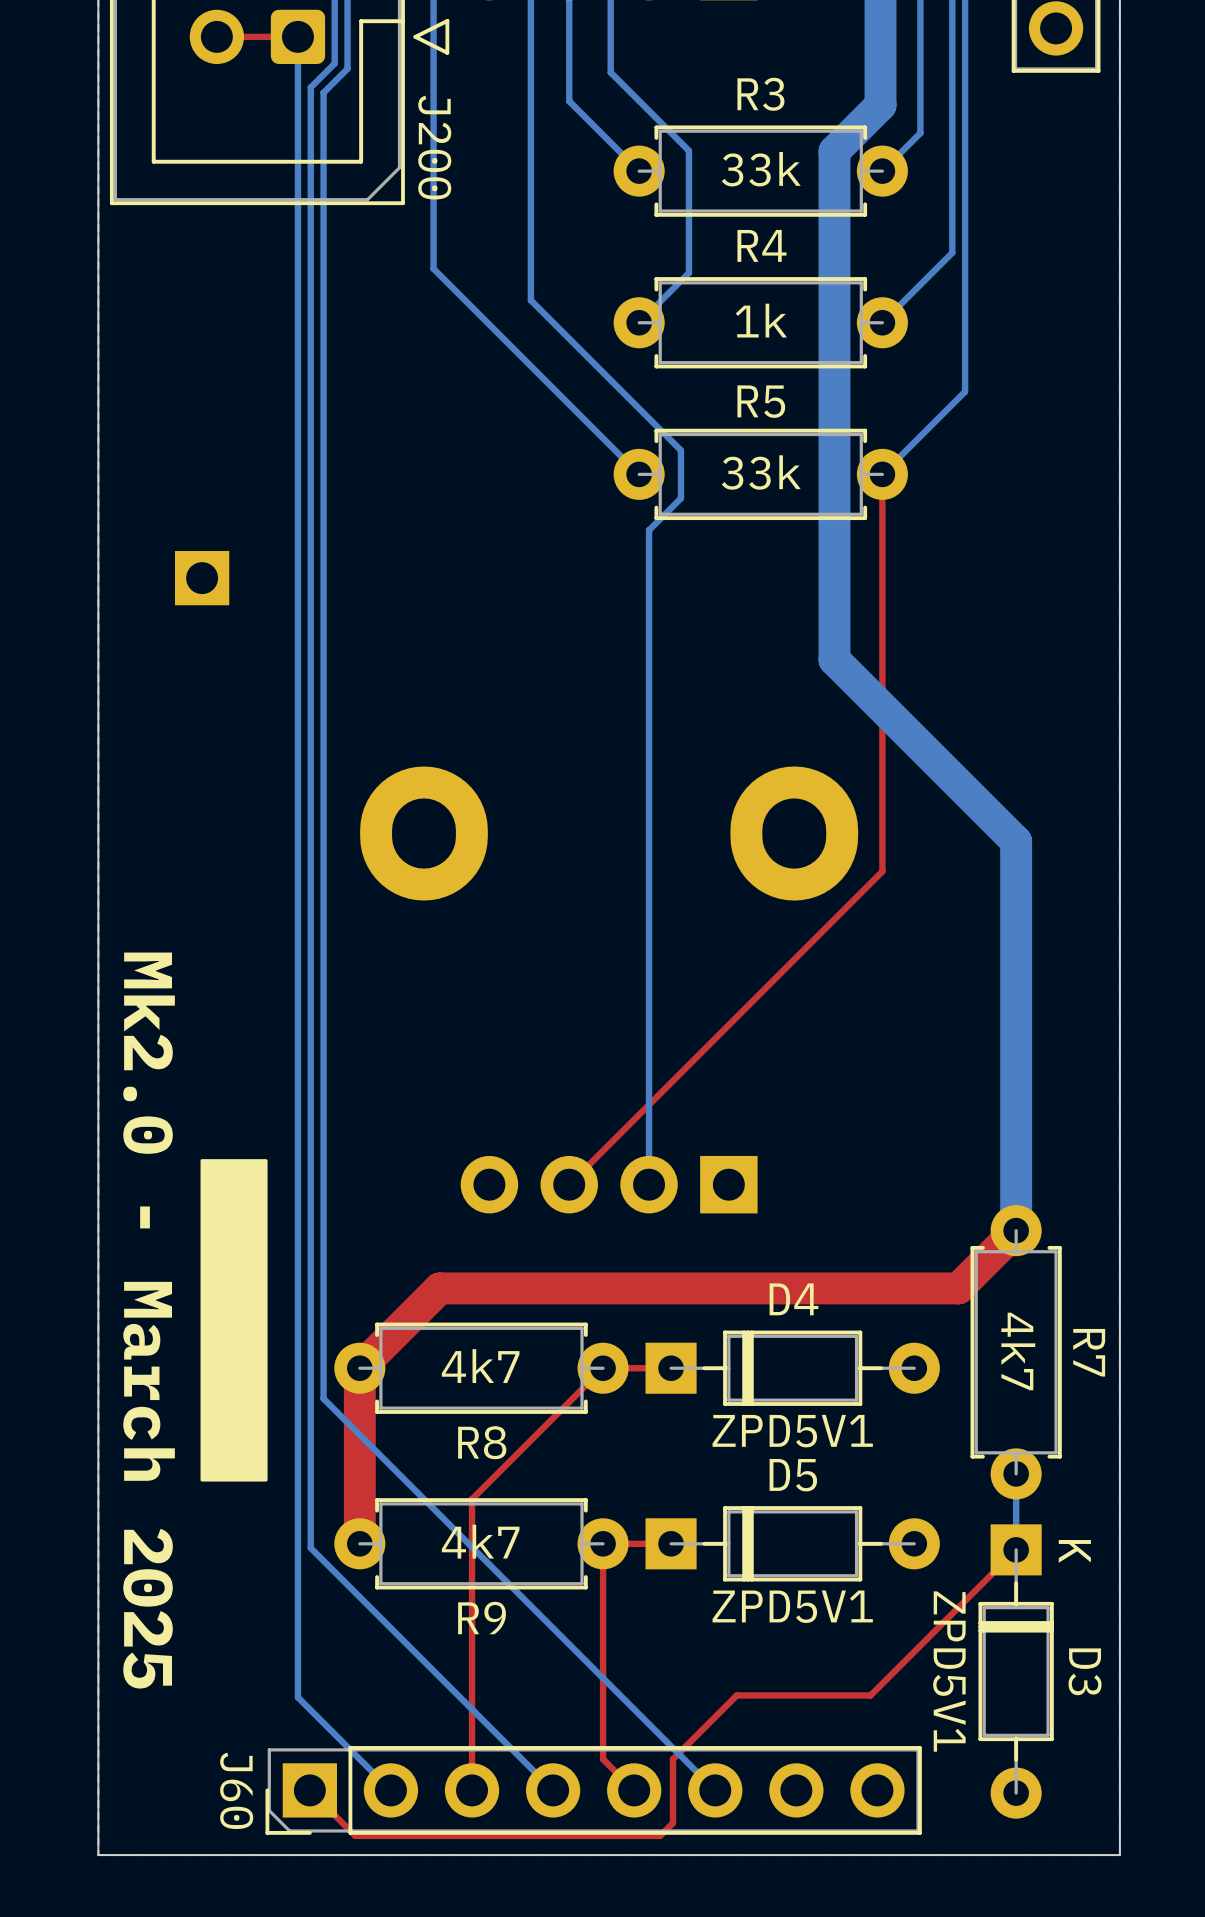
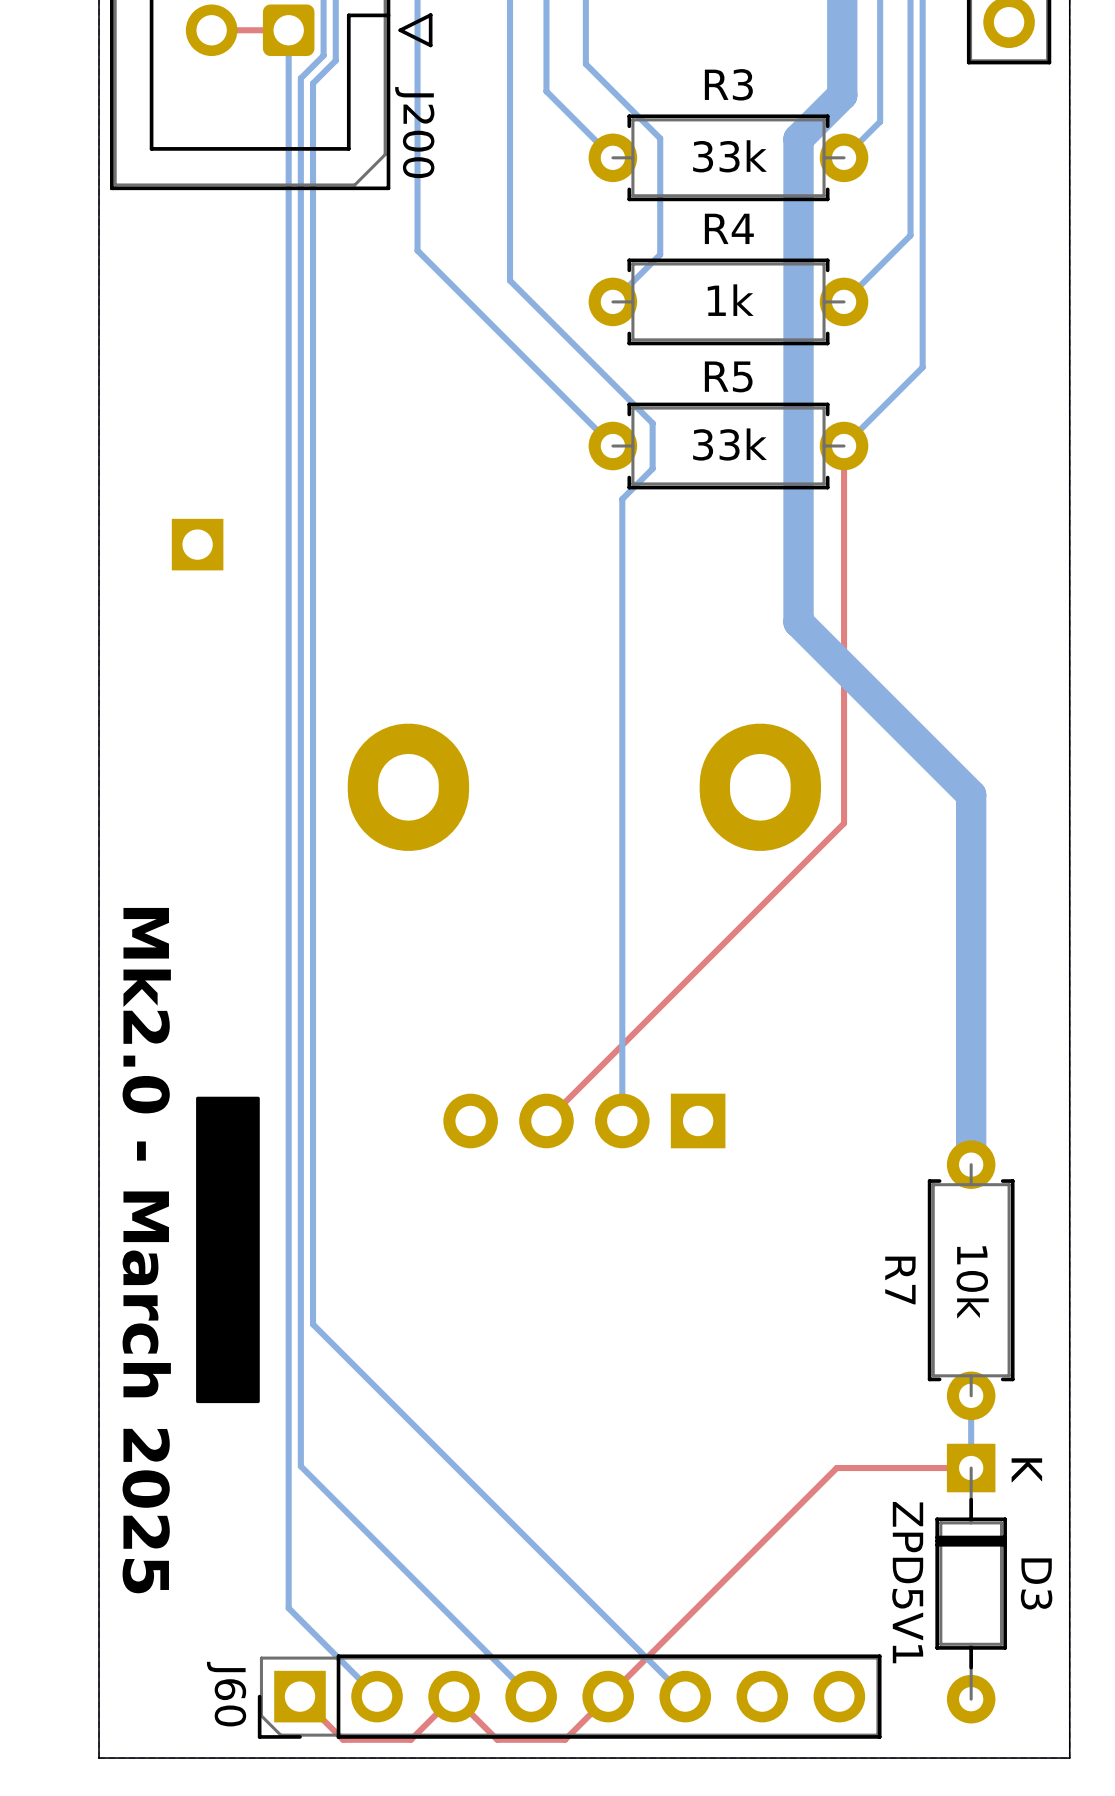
top track: (1016, 1230) (958, 1288) (439, 1288) (359, 1368) (359, 1543) -> none
R7 value: 4k7 (1018, 1351) -> 10k (972, 1282)
R7 name position: R7 (1089, 1352) -> R7 (900, 1280)
R8: 4k7 (481, 1368) -> none
top track: (671, 1368) (603, 1368) (472, 1499) (472, 1790) -> none
D4: ZPD5V1 (792, 1368) -> none
R9: 4k7 (481, 1543) -> none
top track: (671, 1543) (603, 1543) (603, 1759) (634, 1790) -> none
D5: ZPD5V1 (792, 1543) -> none
top track: (1016, 1549) (870, 1695) (736, 1695) (672, 1759) (672, 1823) (660, 1835) (588, 1835) -> (971, 1468) (836, 1468) (565, 1739)
top track: (517, 1835) (426, 1835) -> (497, 1739) (454, 1696) (410, 1739)

